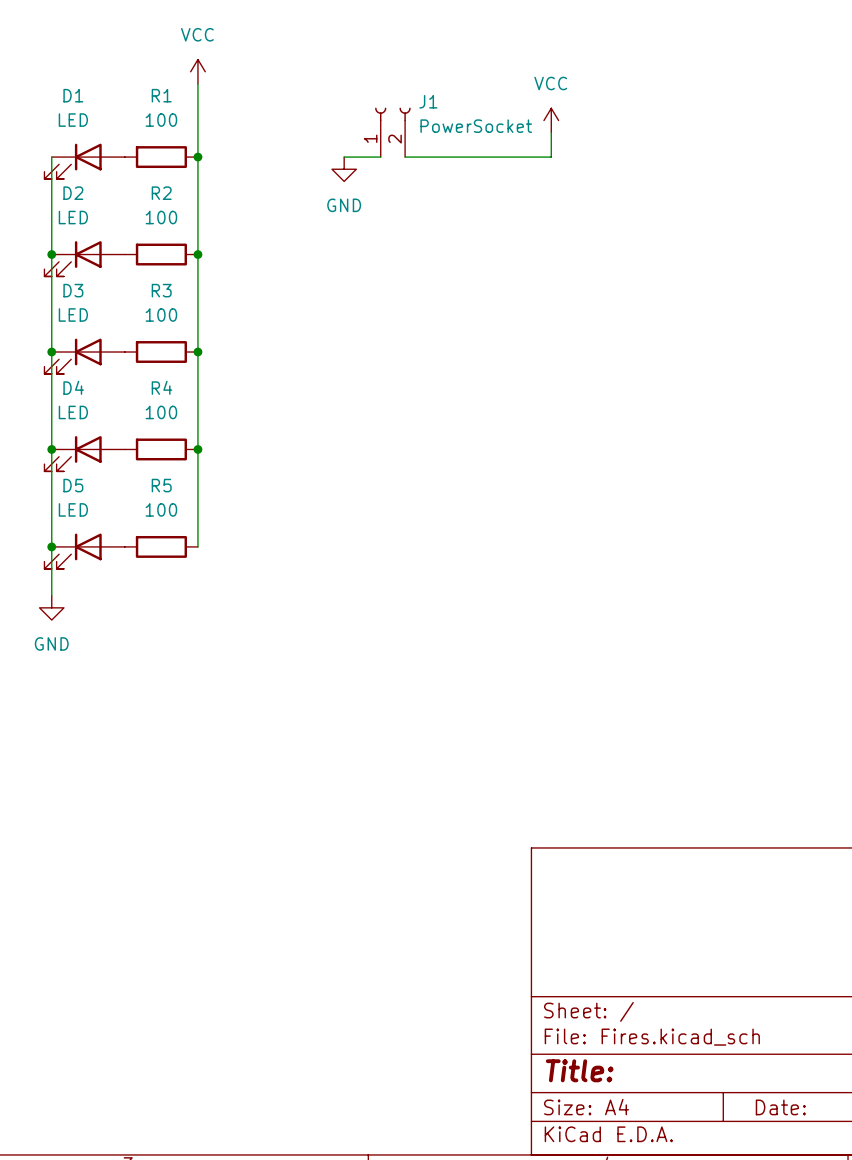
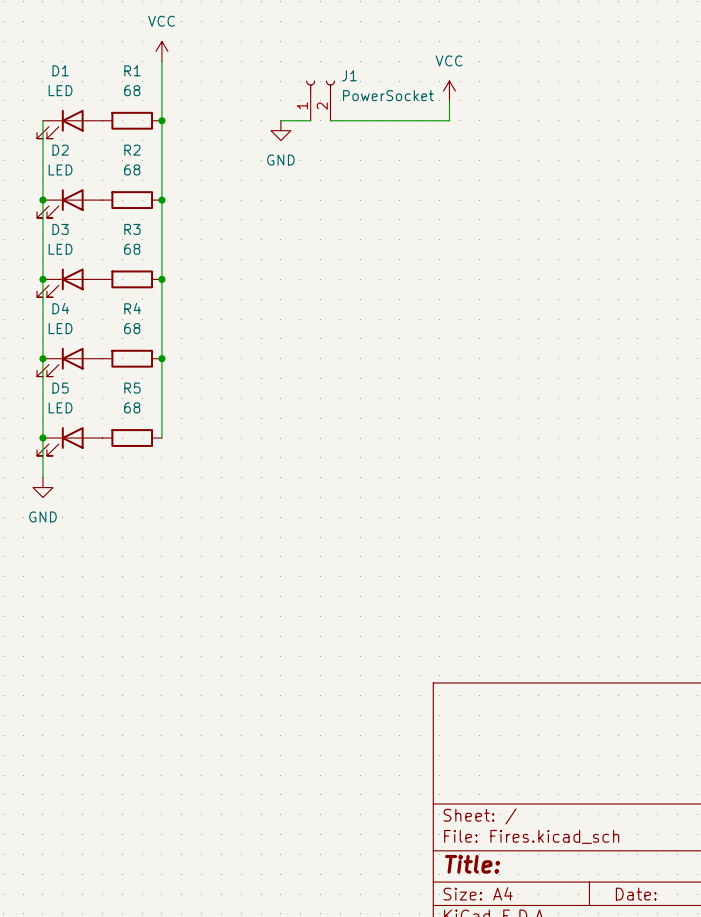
R1 value: 100 (161, 120) -> 68 (132, 90)
R2 value: 100 (161, 217) -> 68 (132, 169)
R3 value: 100 (161, 314) -> 68 (132, 249)
R4 value: 100 (161, 412) -> 68 (132, 328)
R5 value: 100 (161, 509) -> 68 (132, 407)

